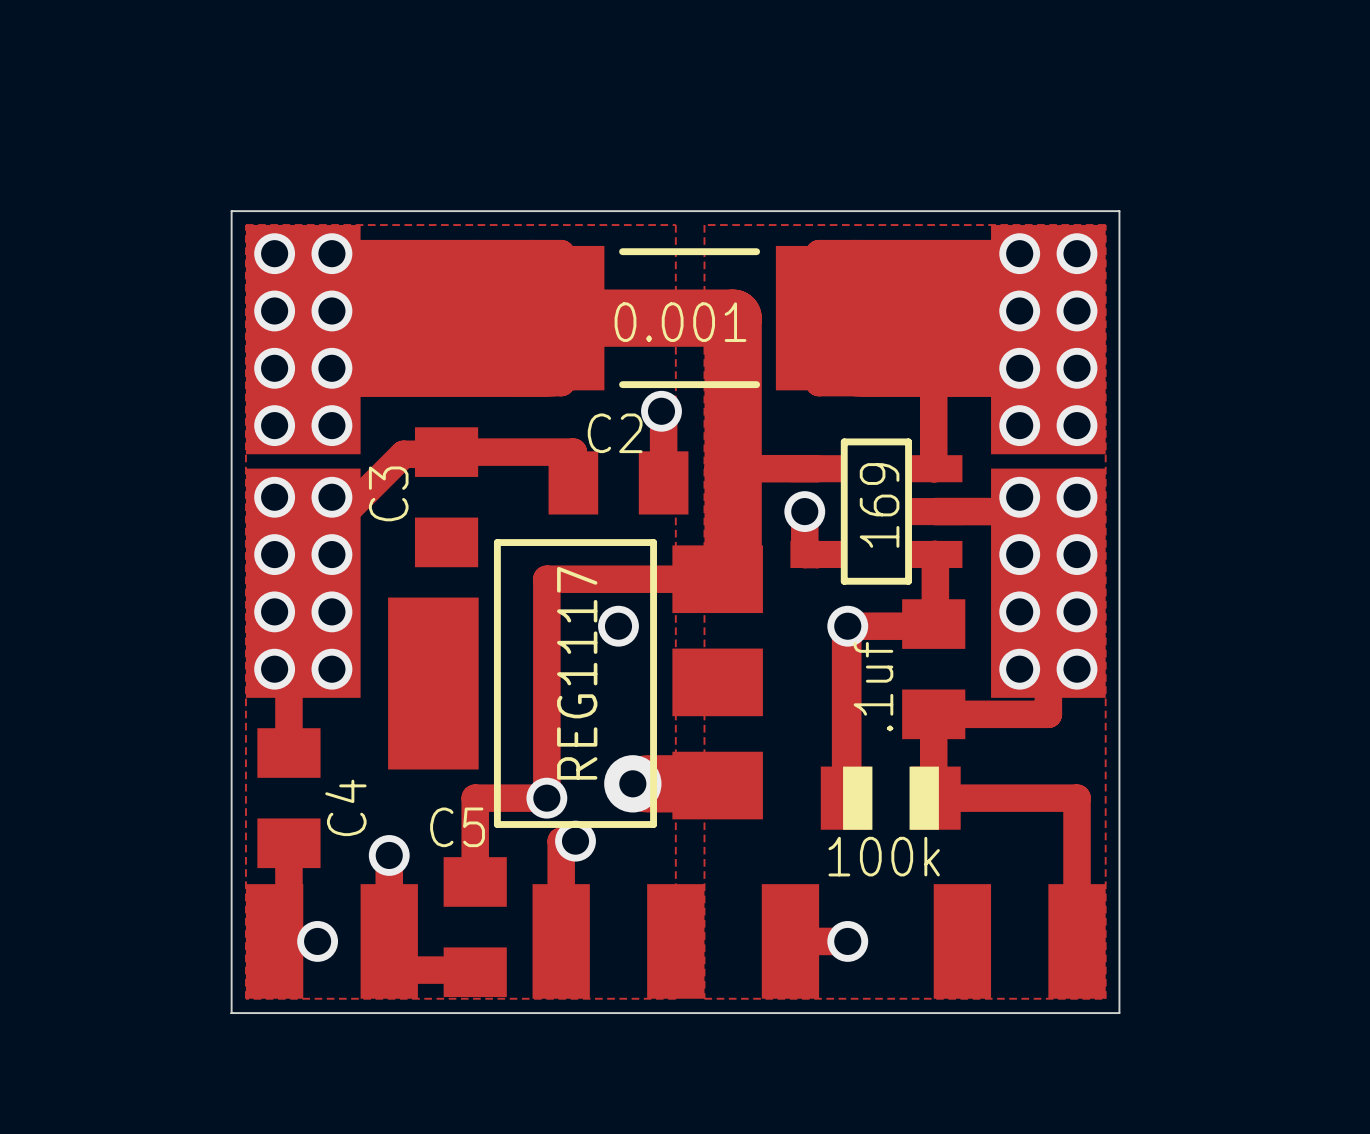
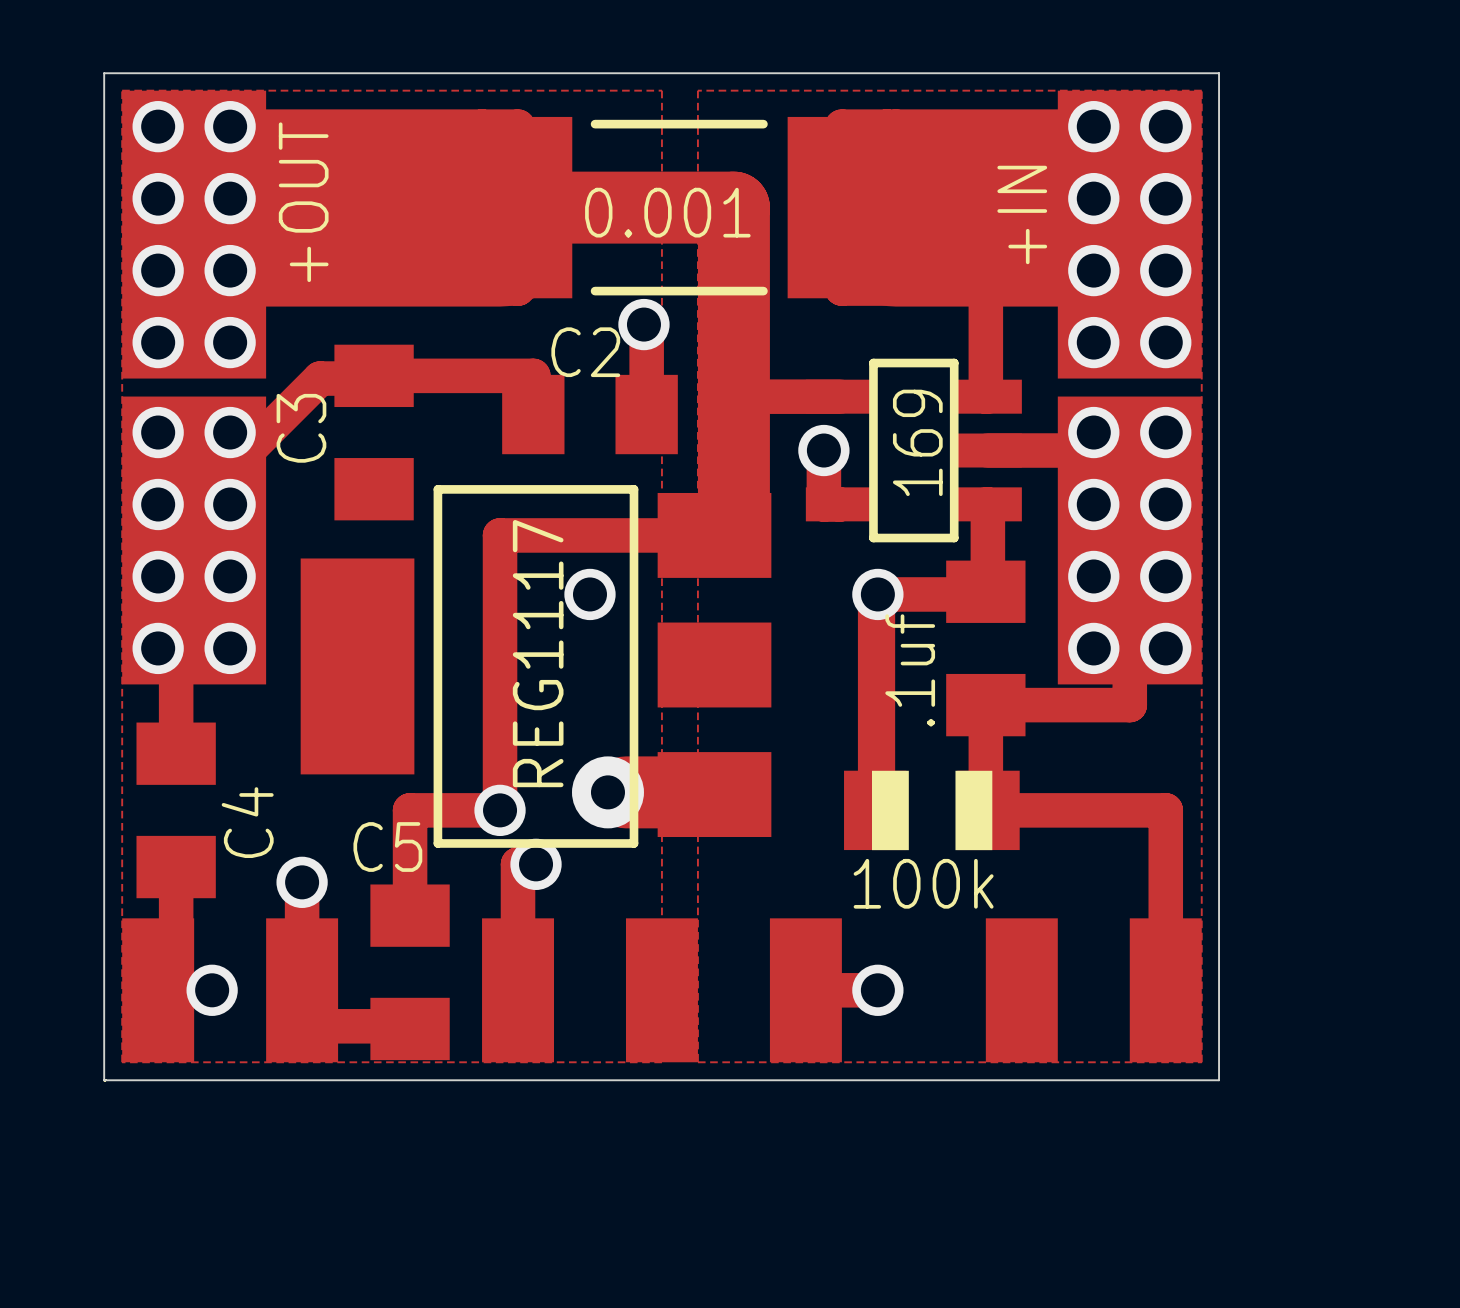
text: none -> +OUT (303, 202)
text: none -> +IN (1022, 214)

